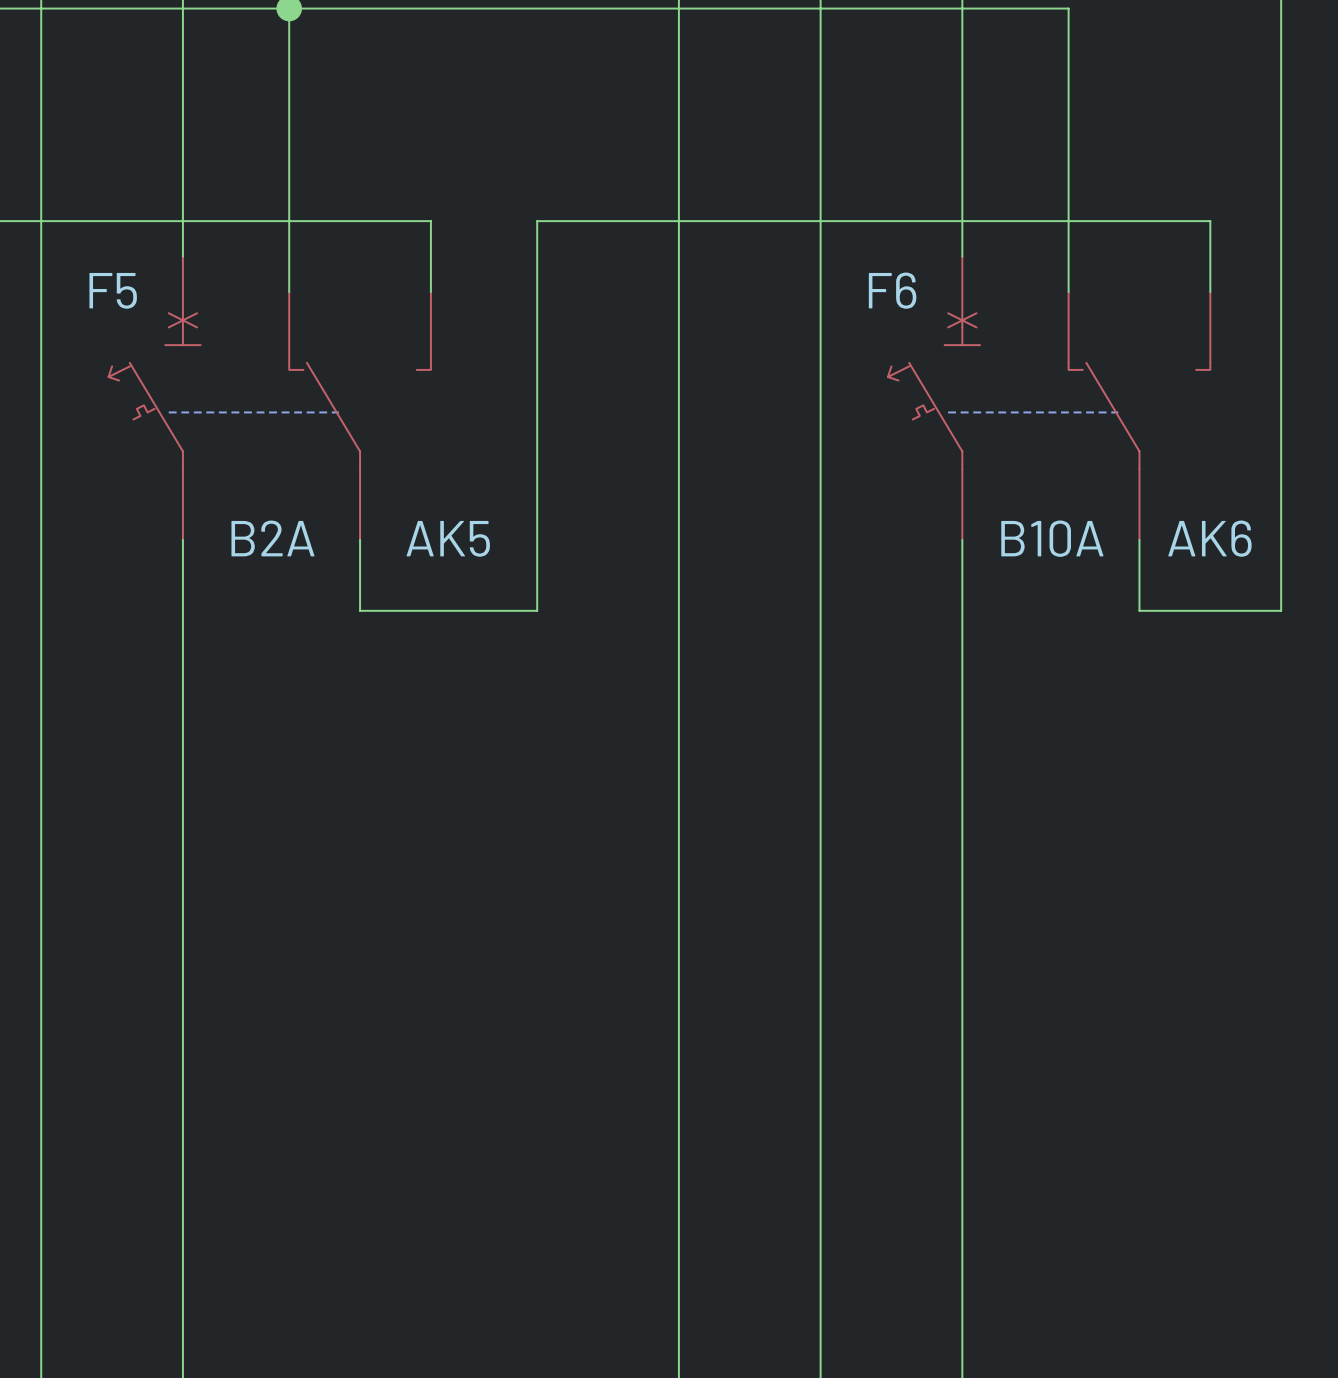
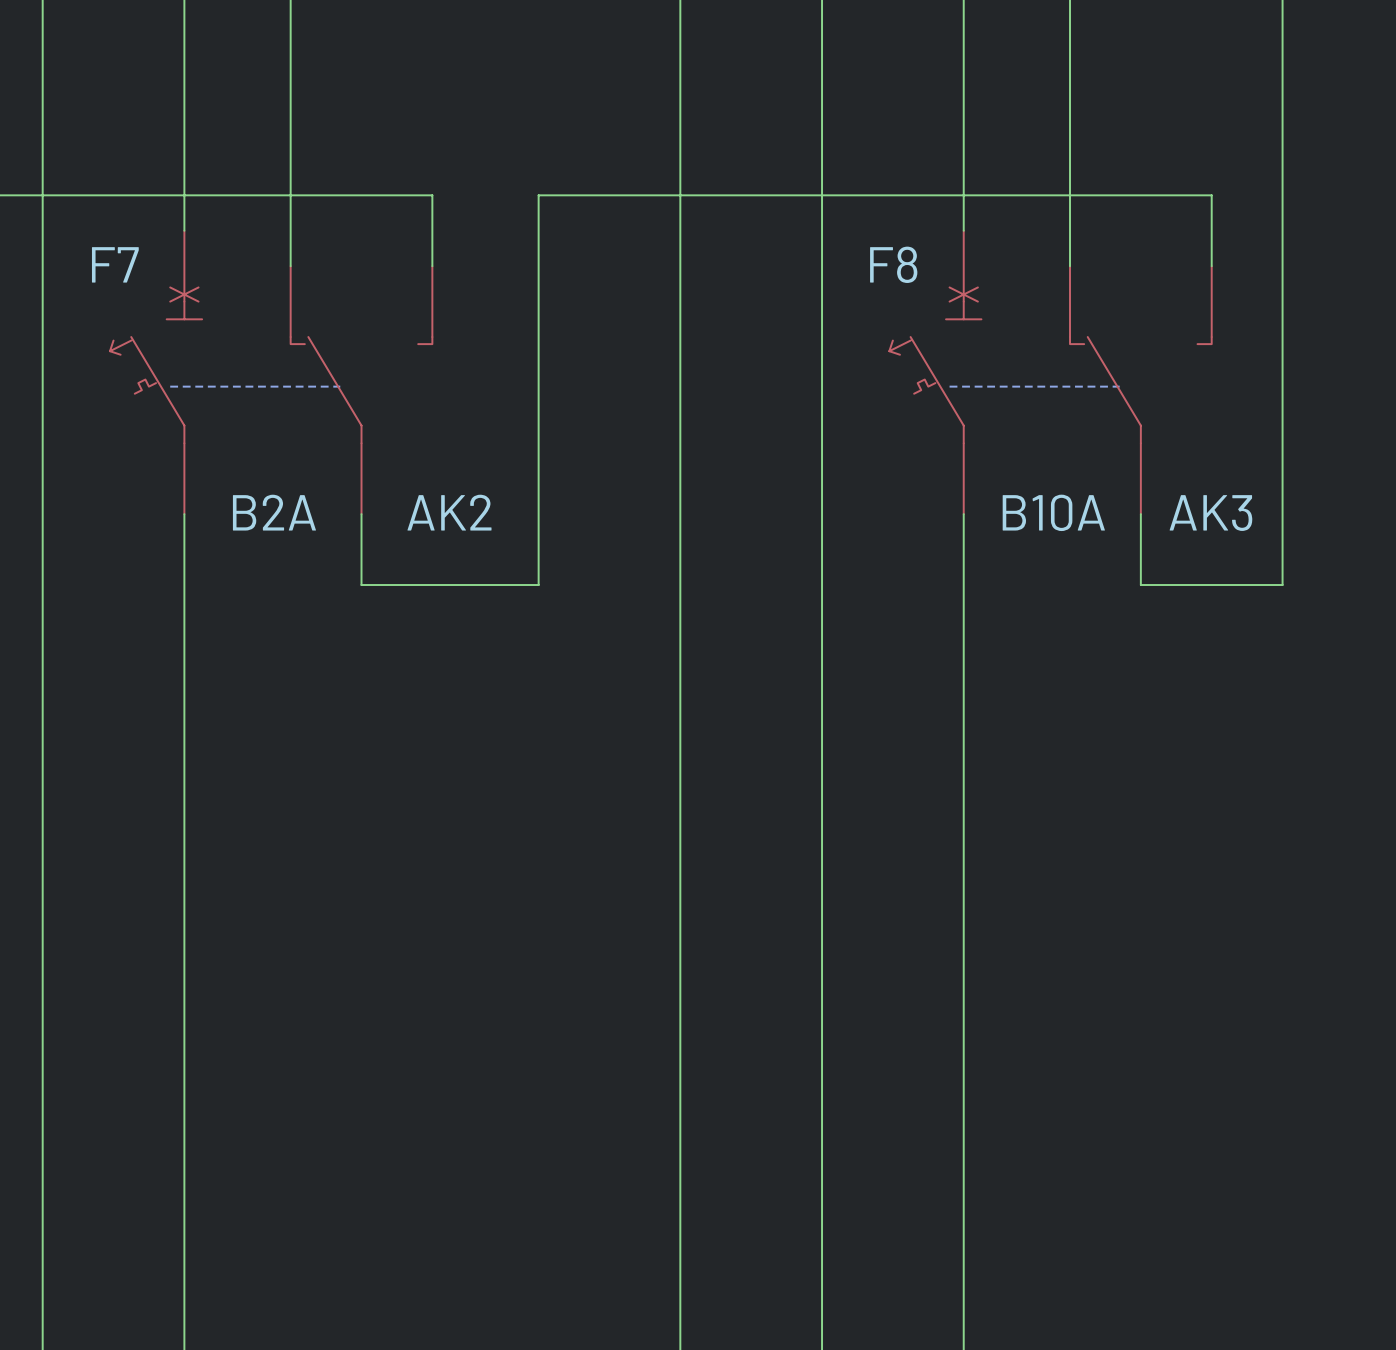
F5 name: F5 (113, 290) -> F7 (115, 264)
F6 name: F6 (892, 290) -> F8 (893, 264)
AK5 name: AK5 (448, 538) -> AK2 (449, 512)
AK6 name: AK6 (1209, 538) -> AK3 (1210, 513)

